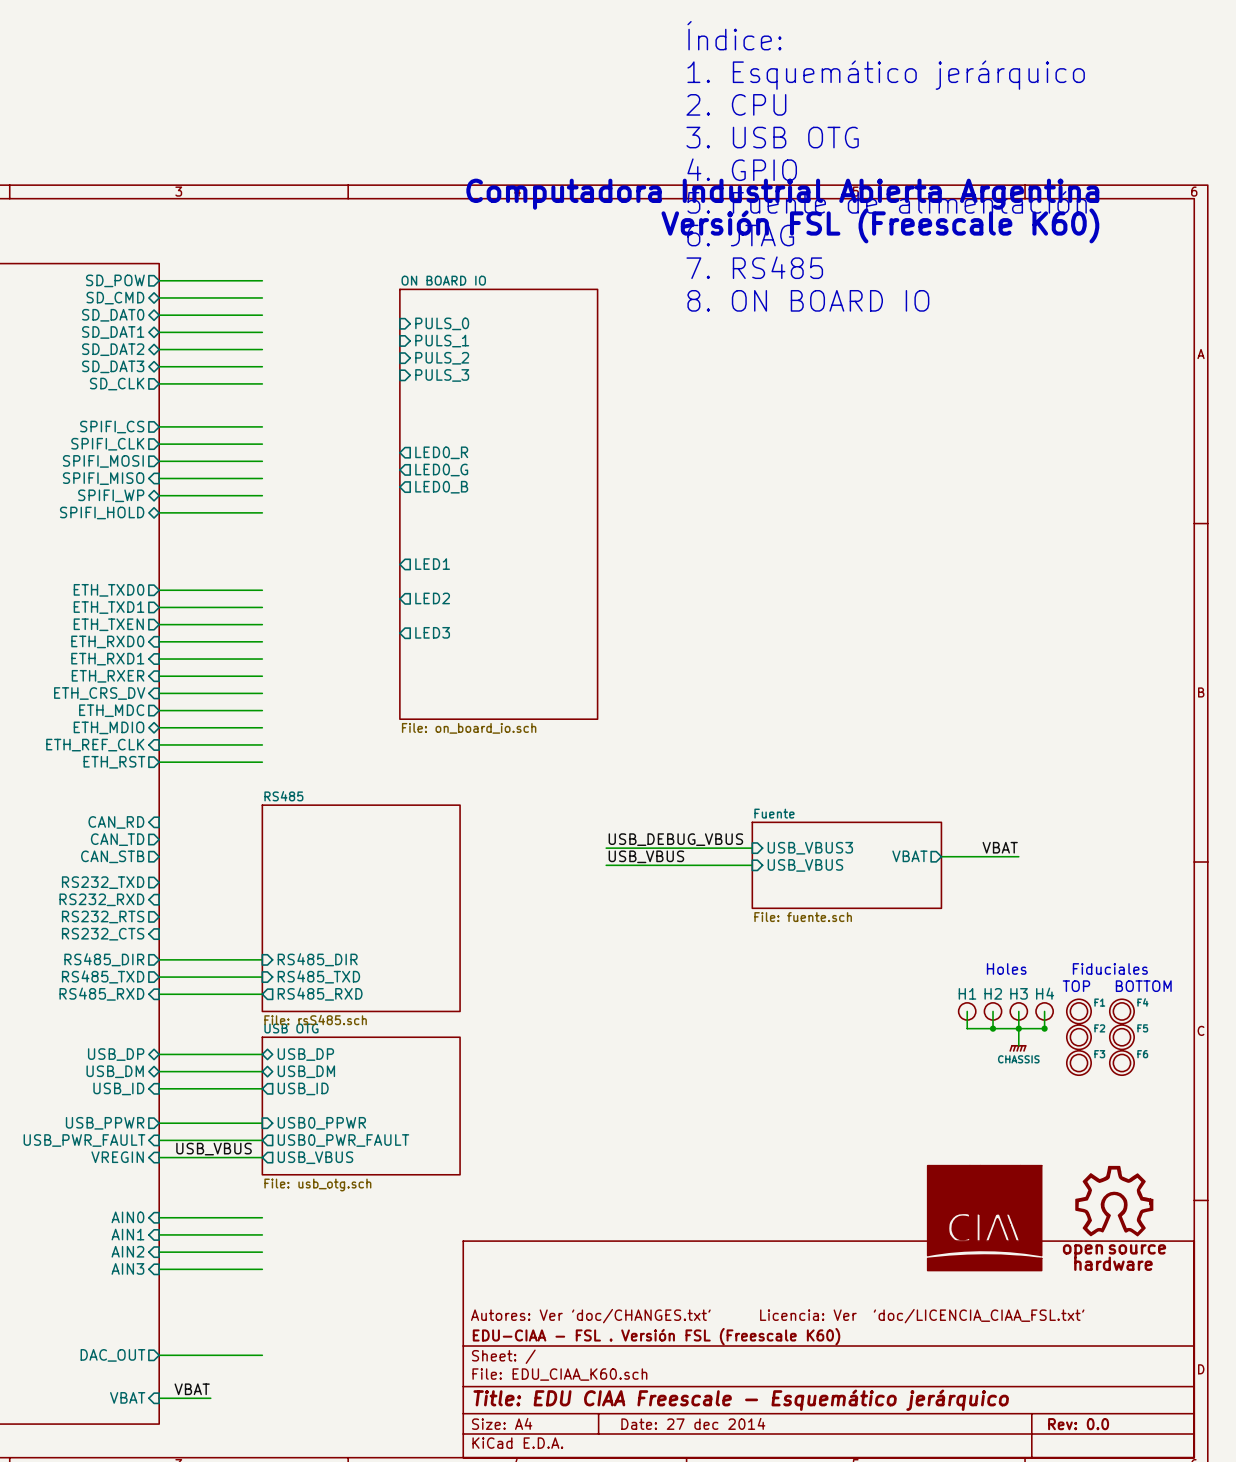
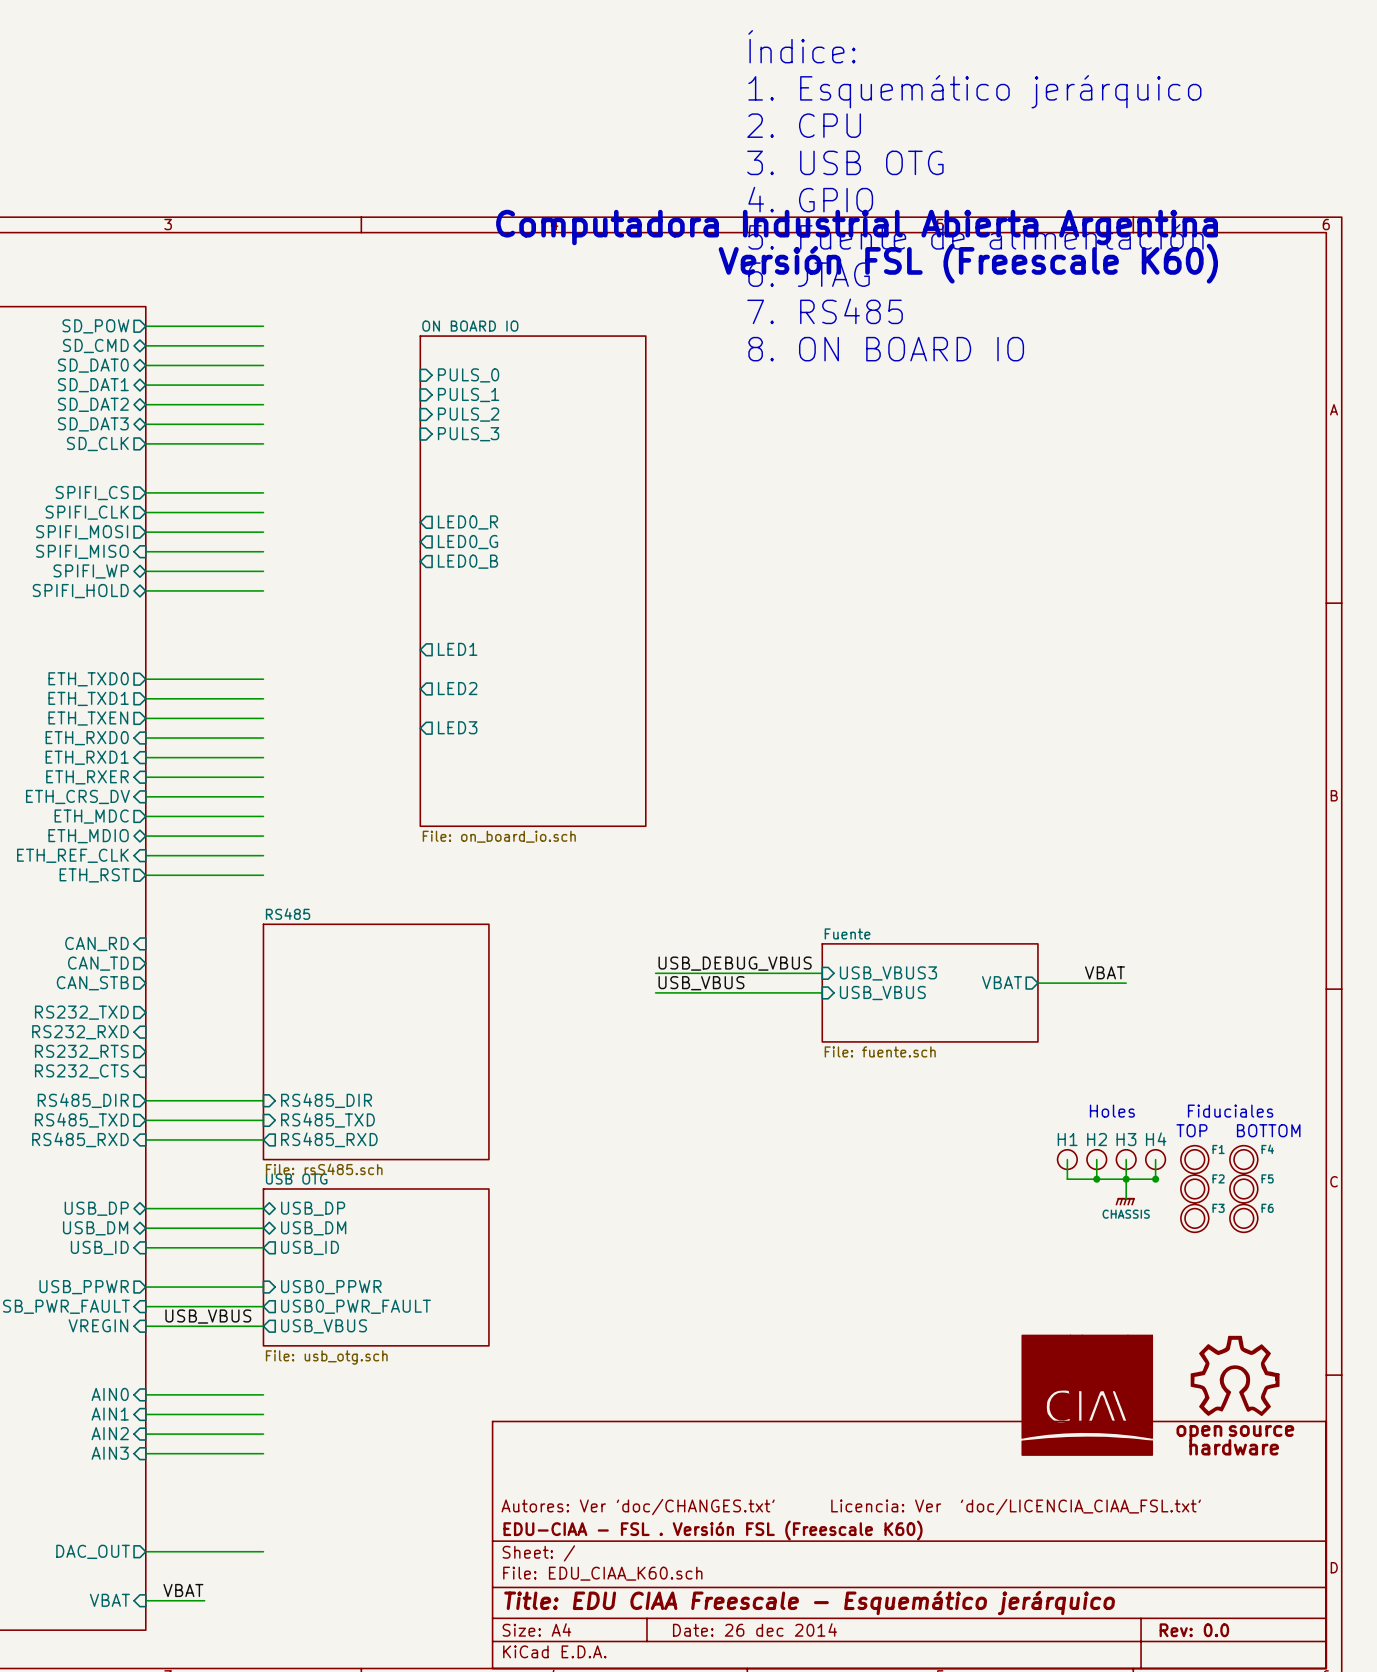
title block: Date: 27 dec 2014 (693, 1423) -> Date: 26 dec 2014 (755, 1629)

